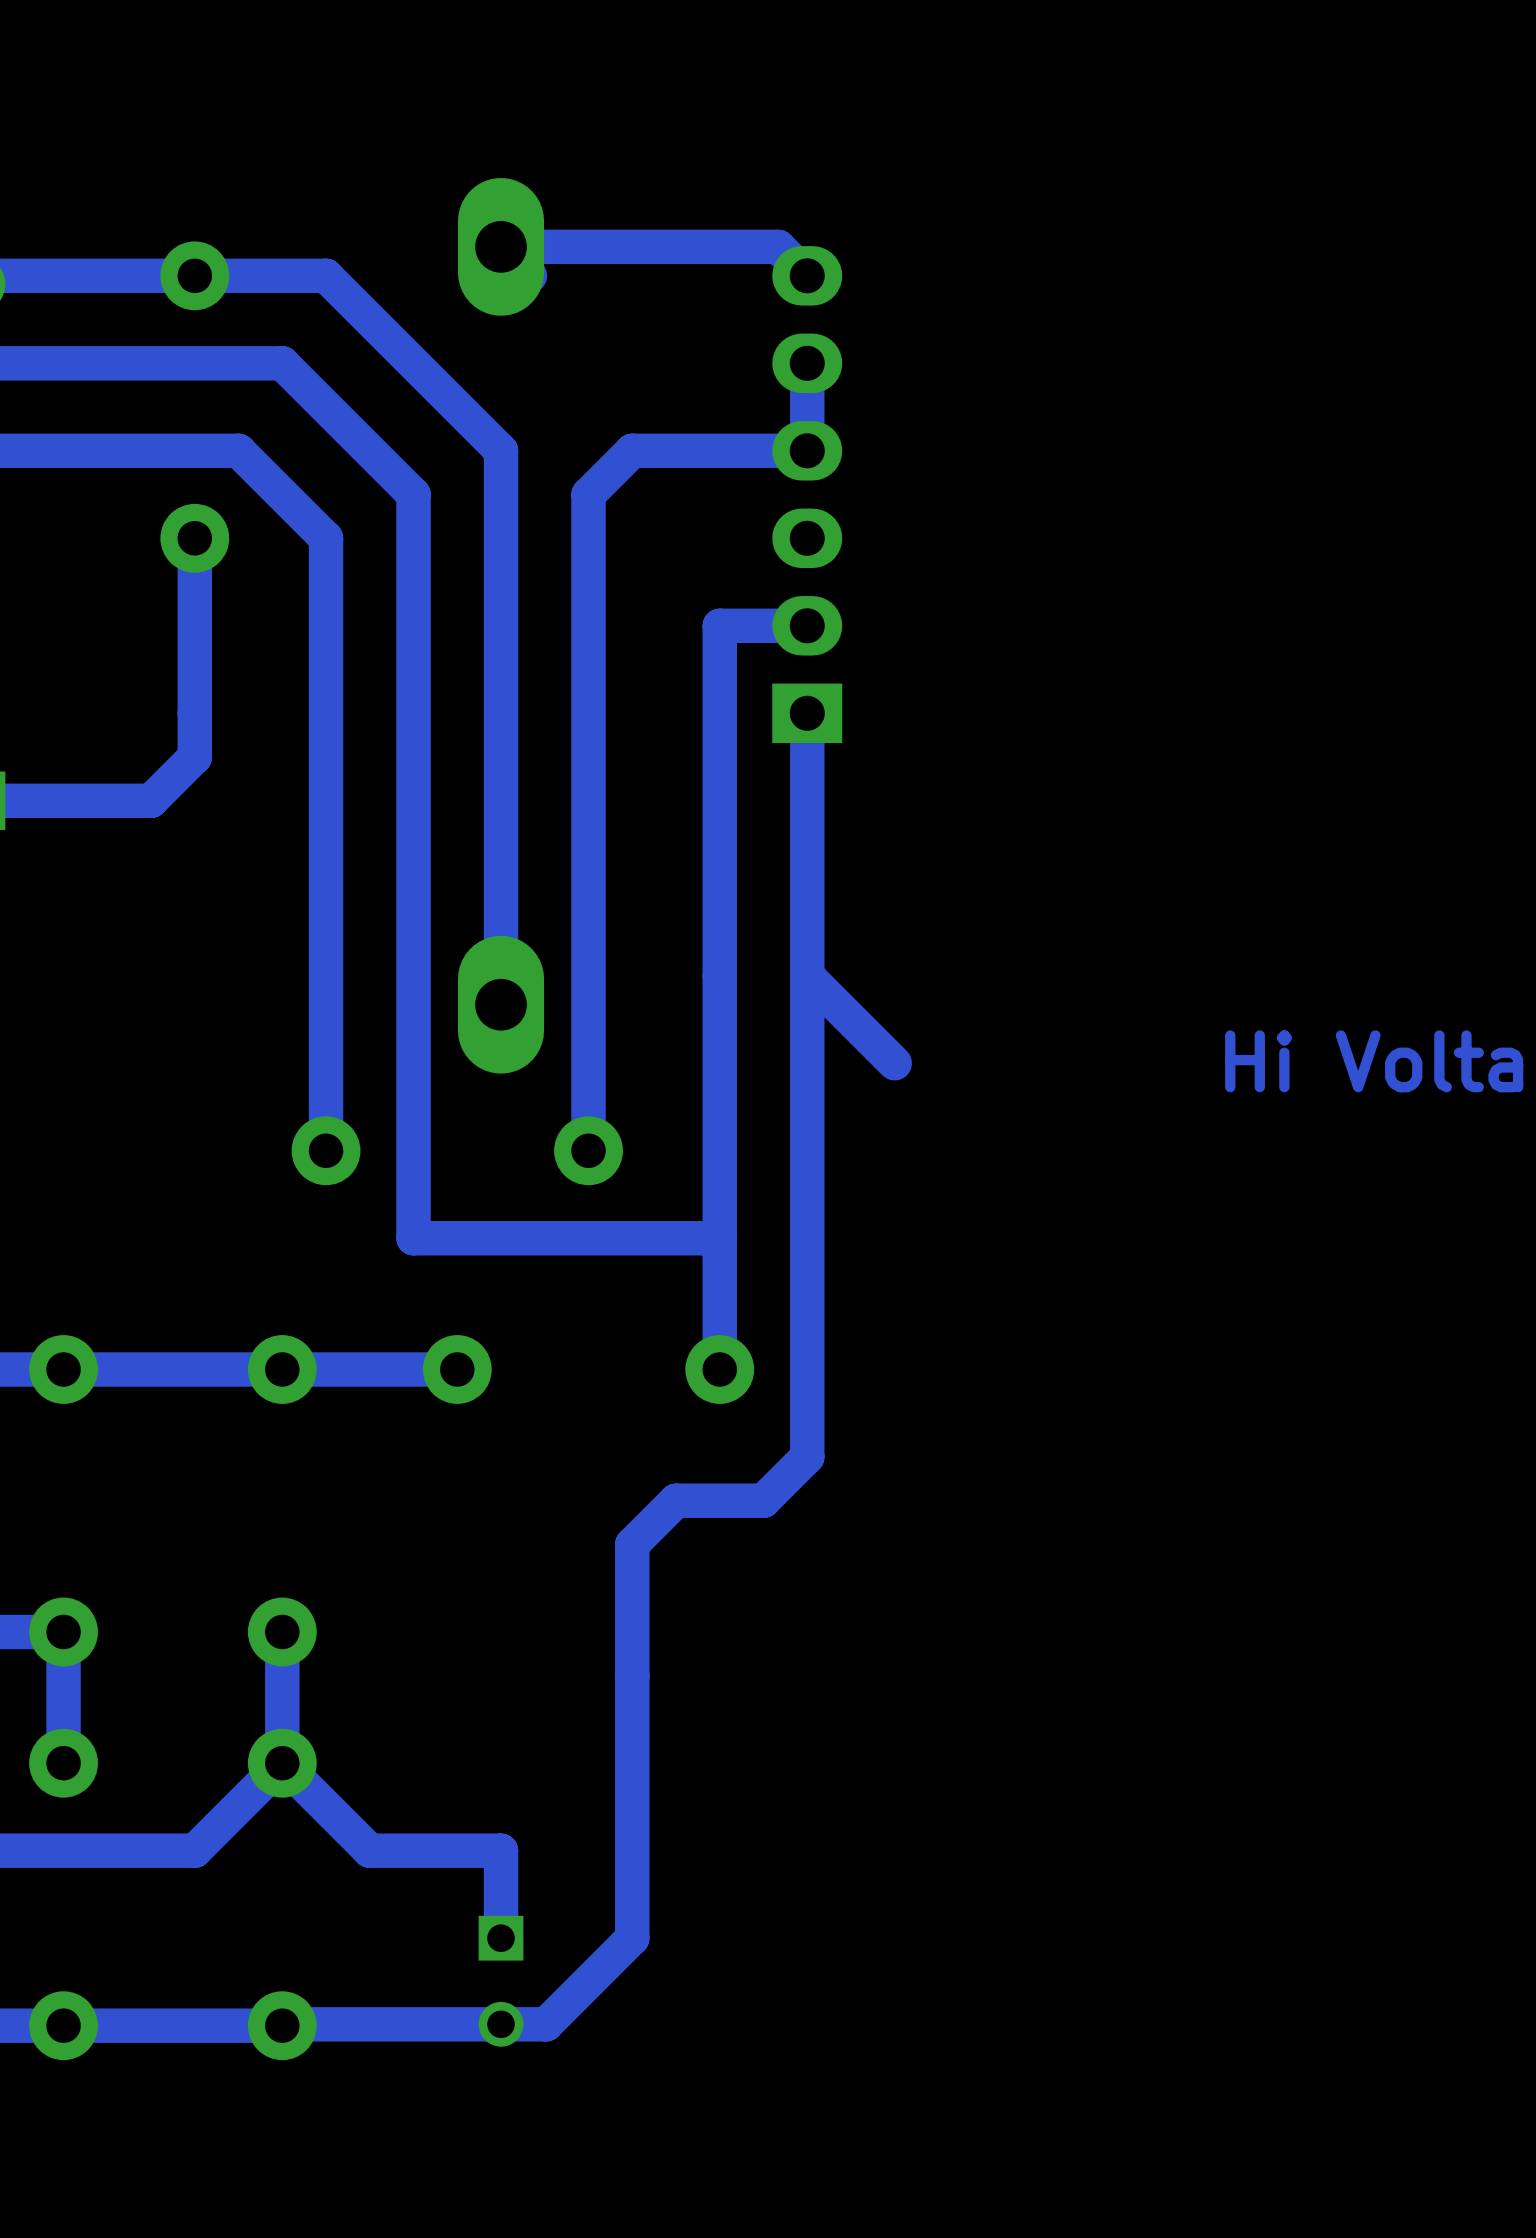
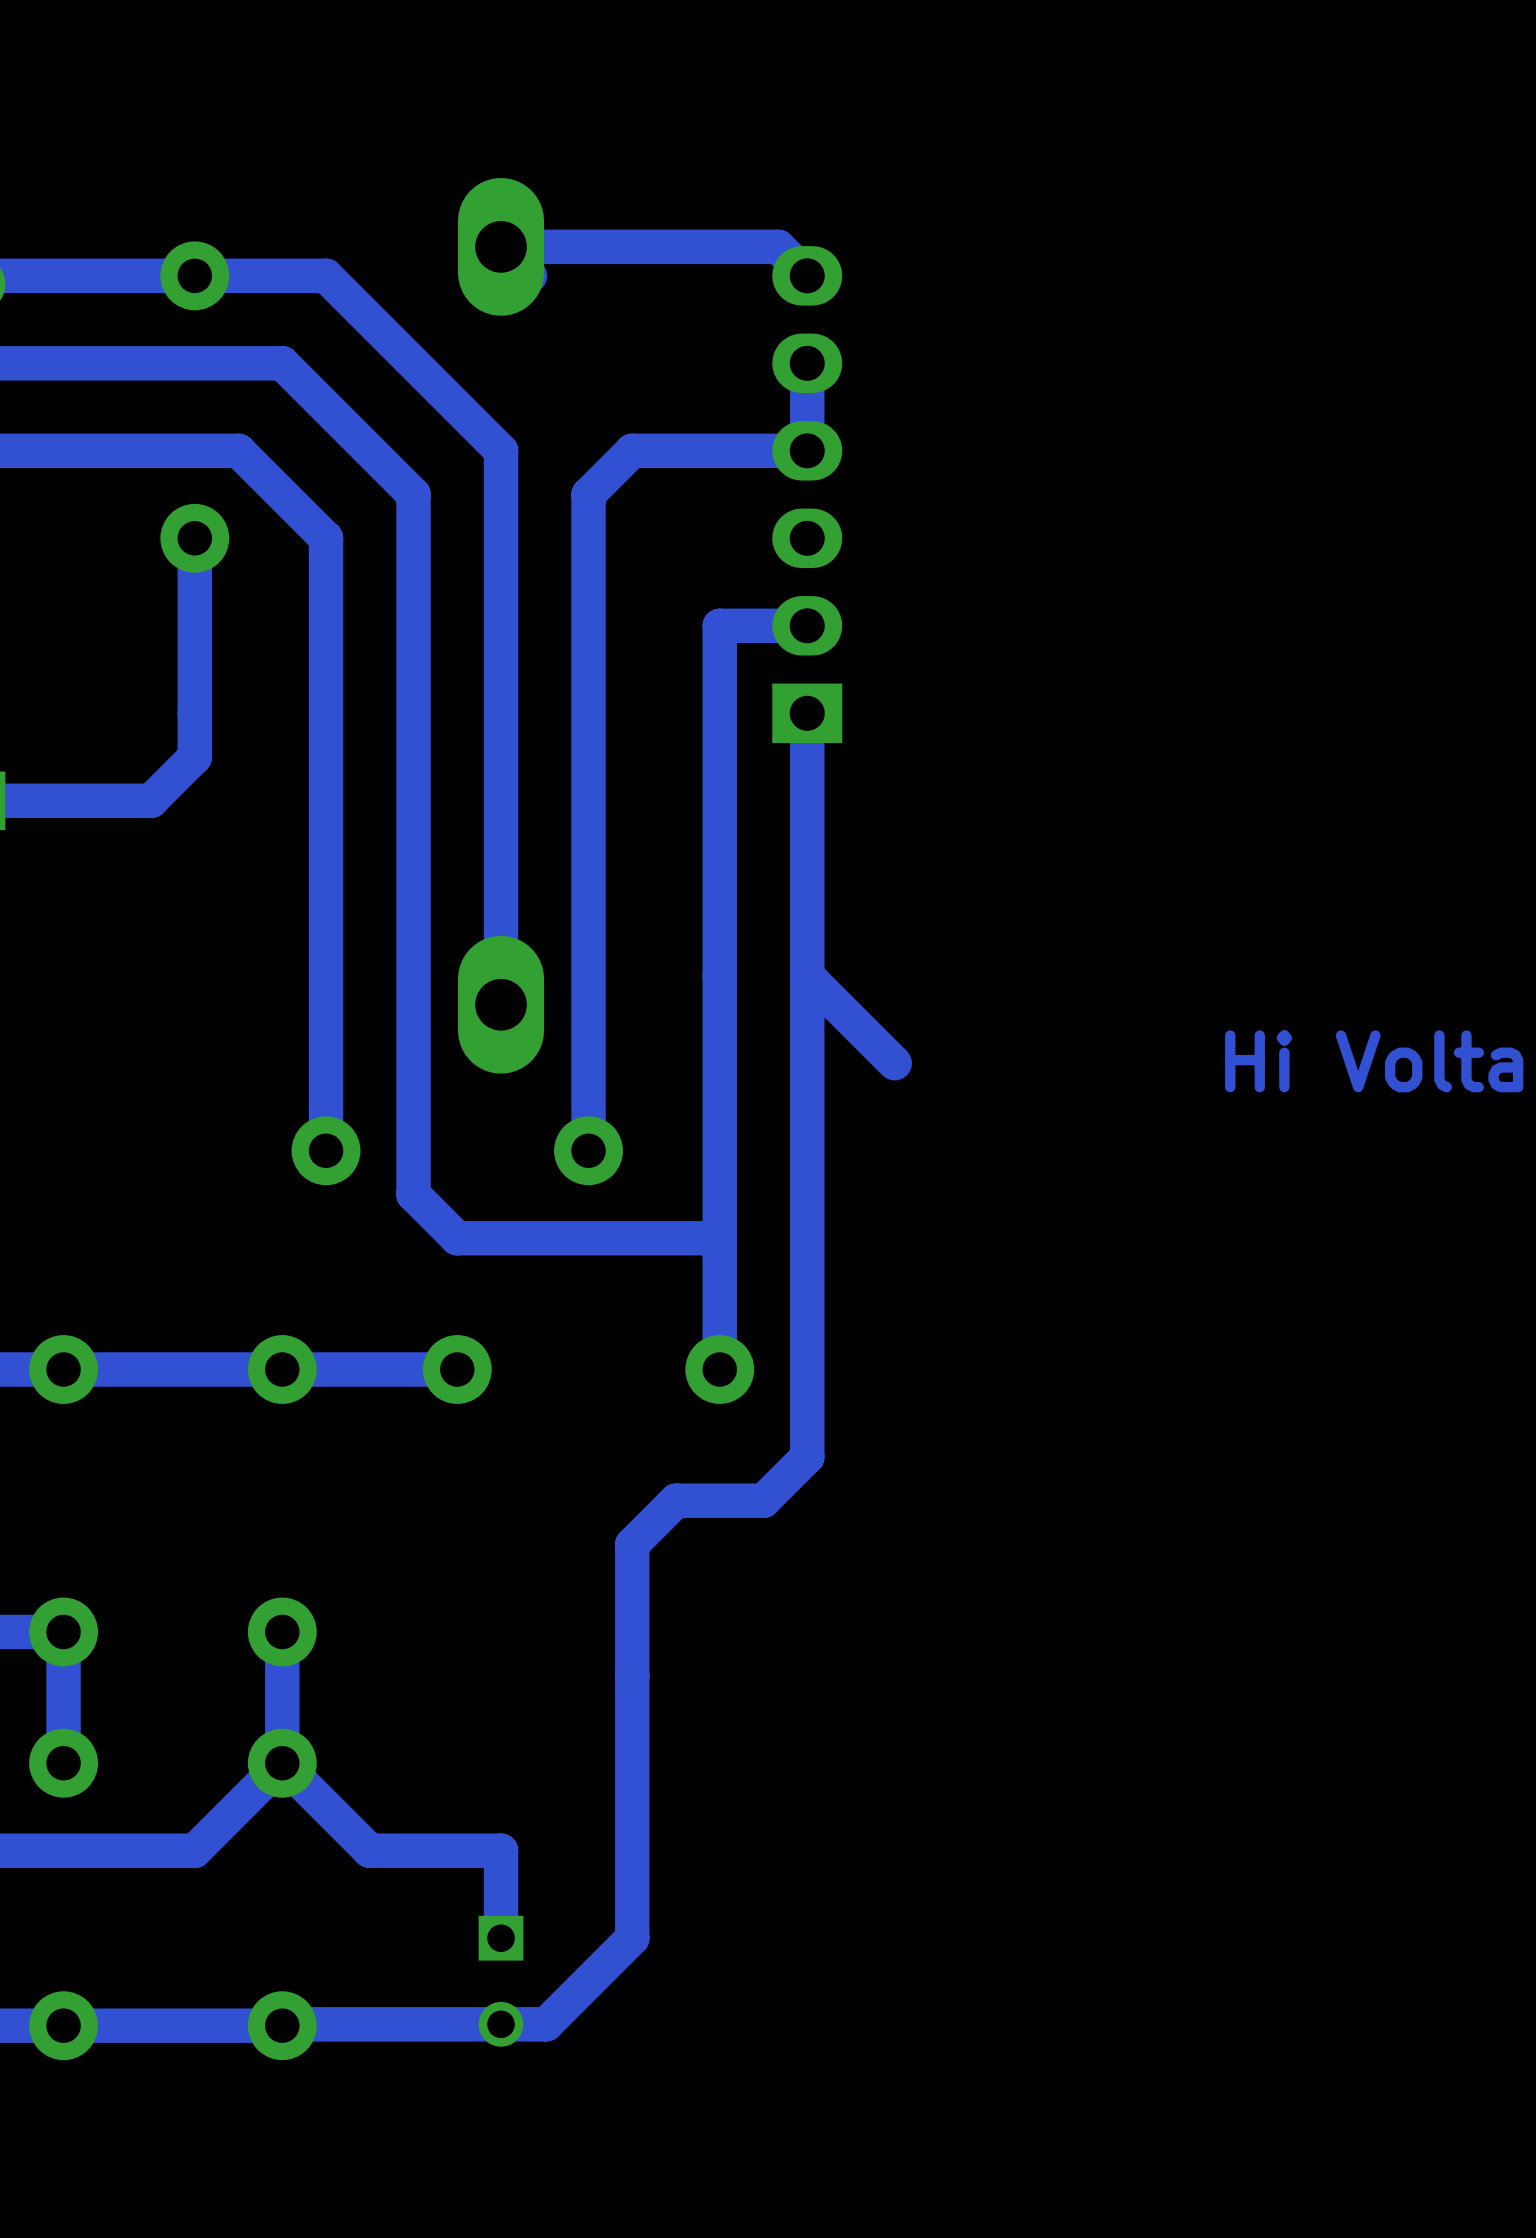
track: (413, 1194) (413, 1238) (457, 1238) -> (413, 1194) (457, 1238)

